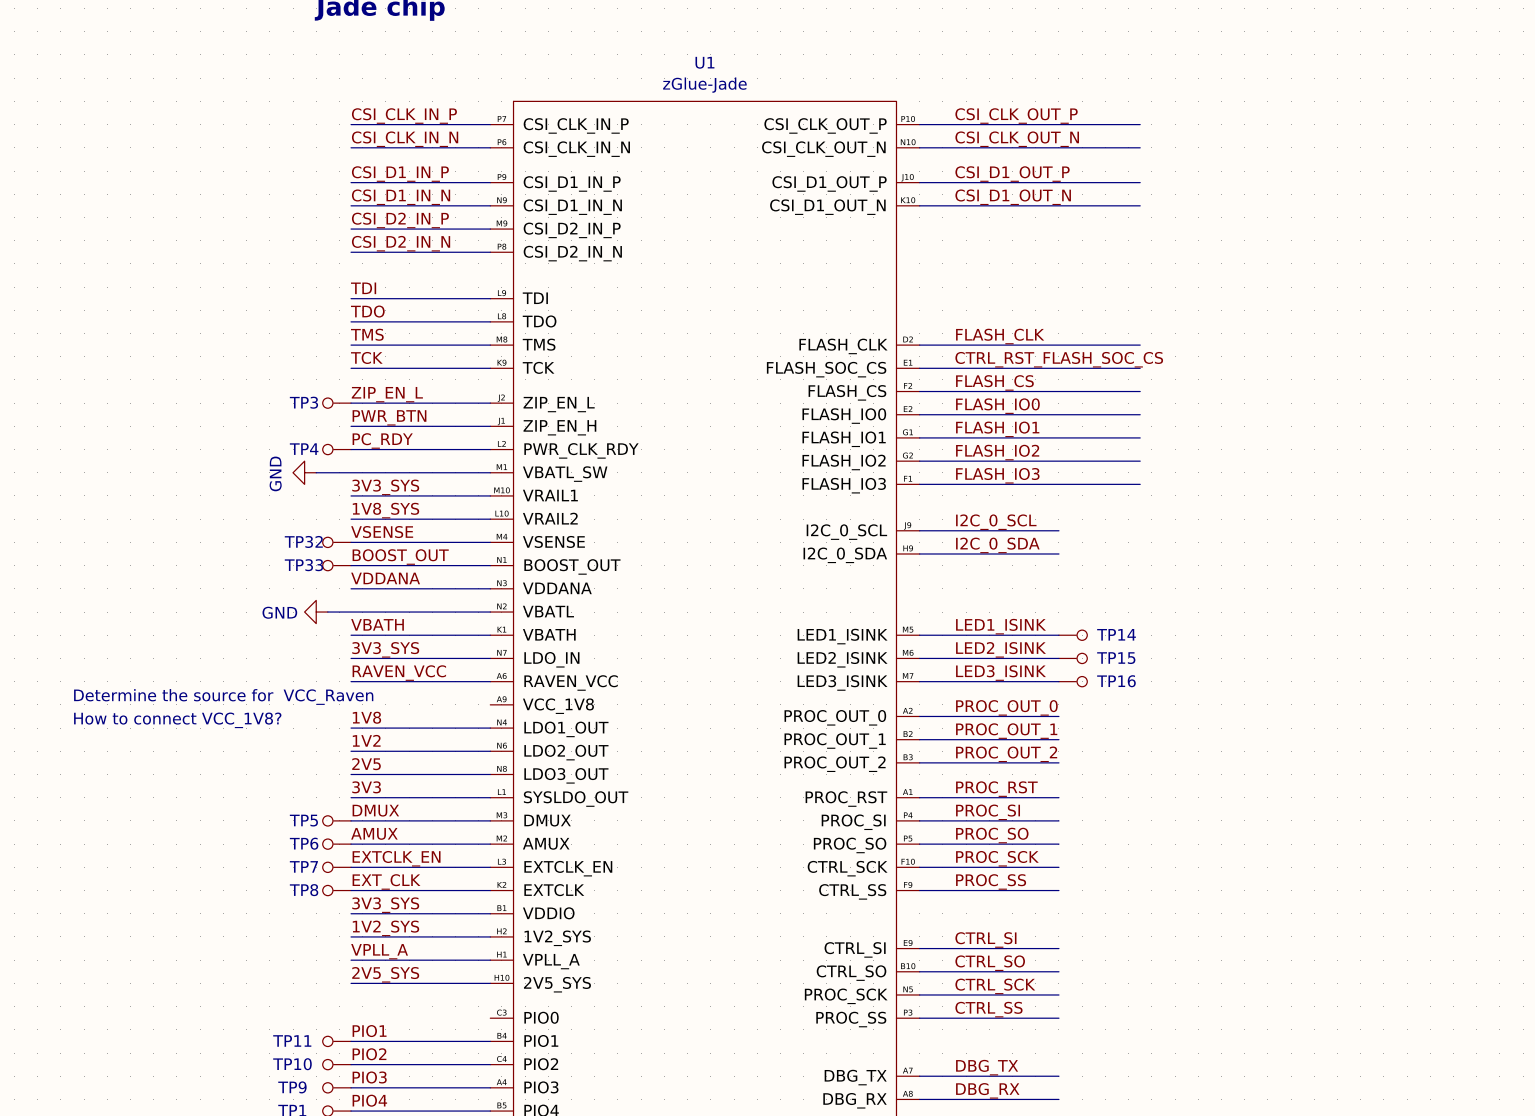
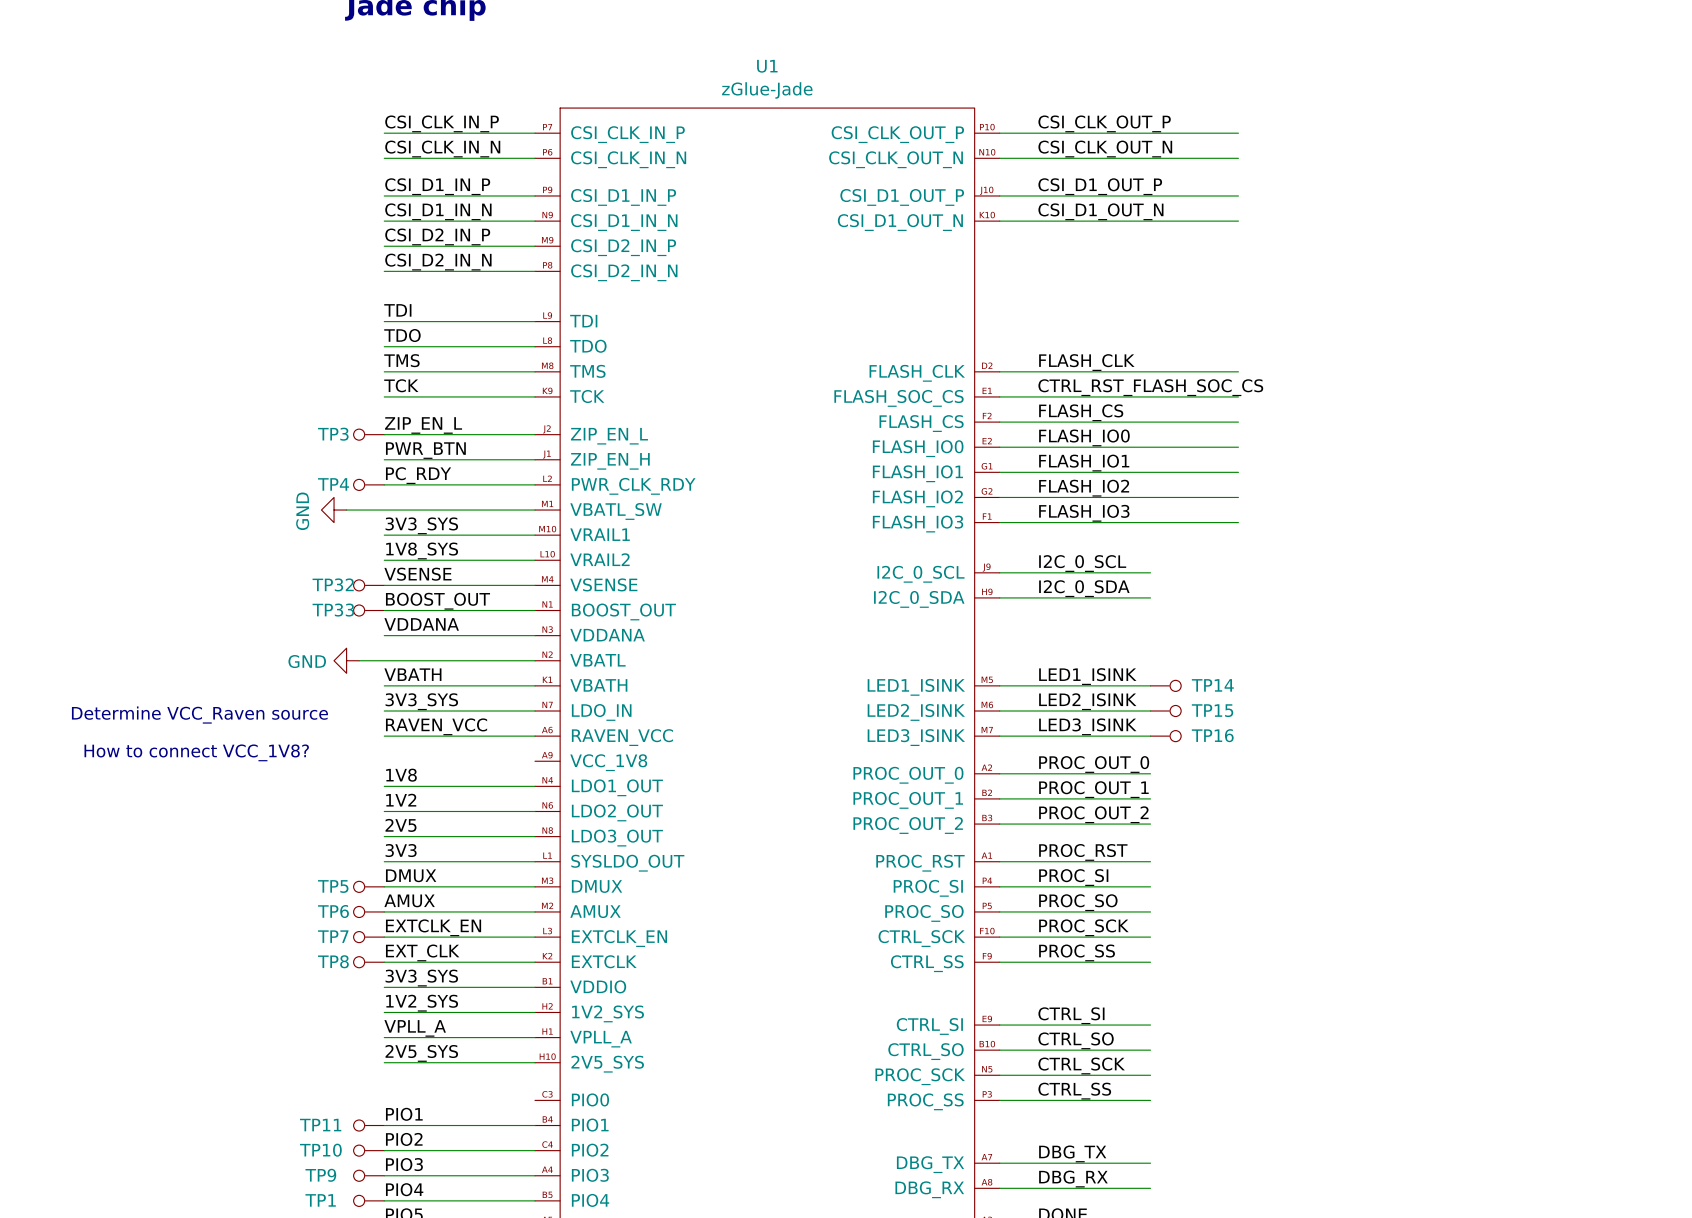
text: none -> Determine VCC_Raven source (199, 715)
text: Determine the source for VCC_Raven (223, 696) -> How to connect VCC_1V8? (196, 752)
text: How to connect VCC_1V8? (177, 720) -> none

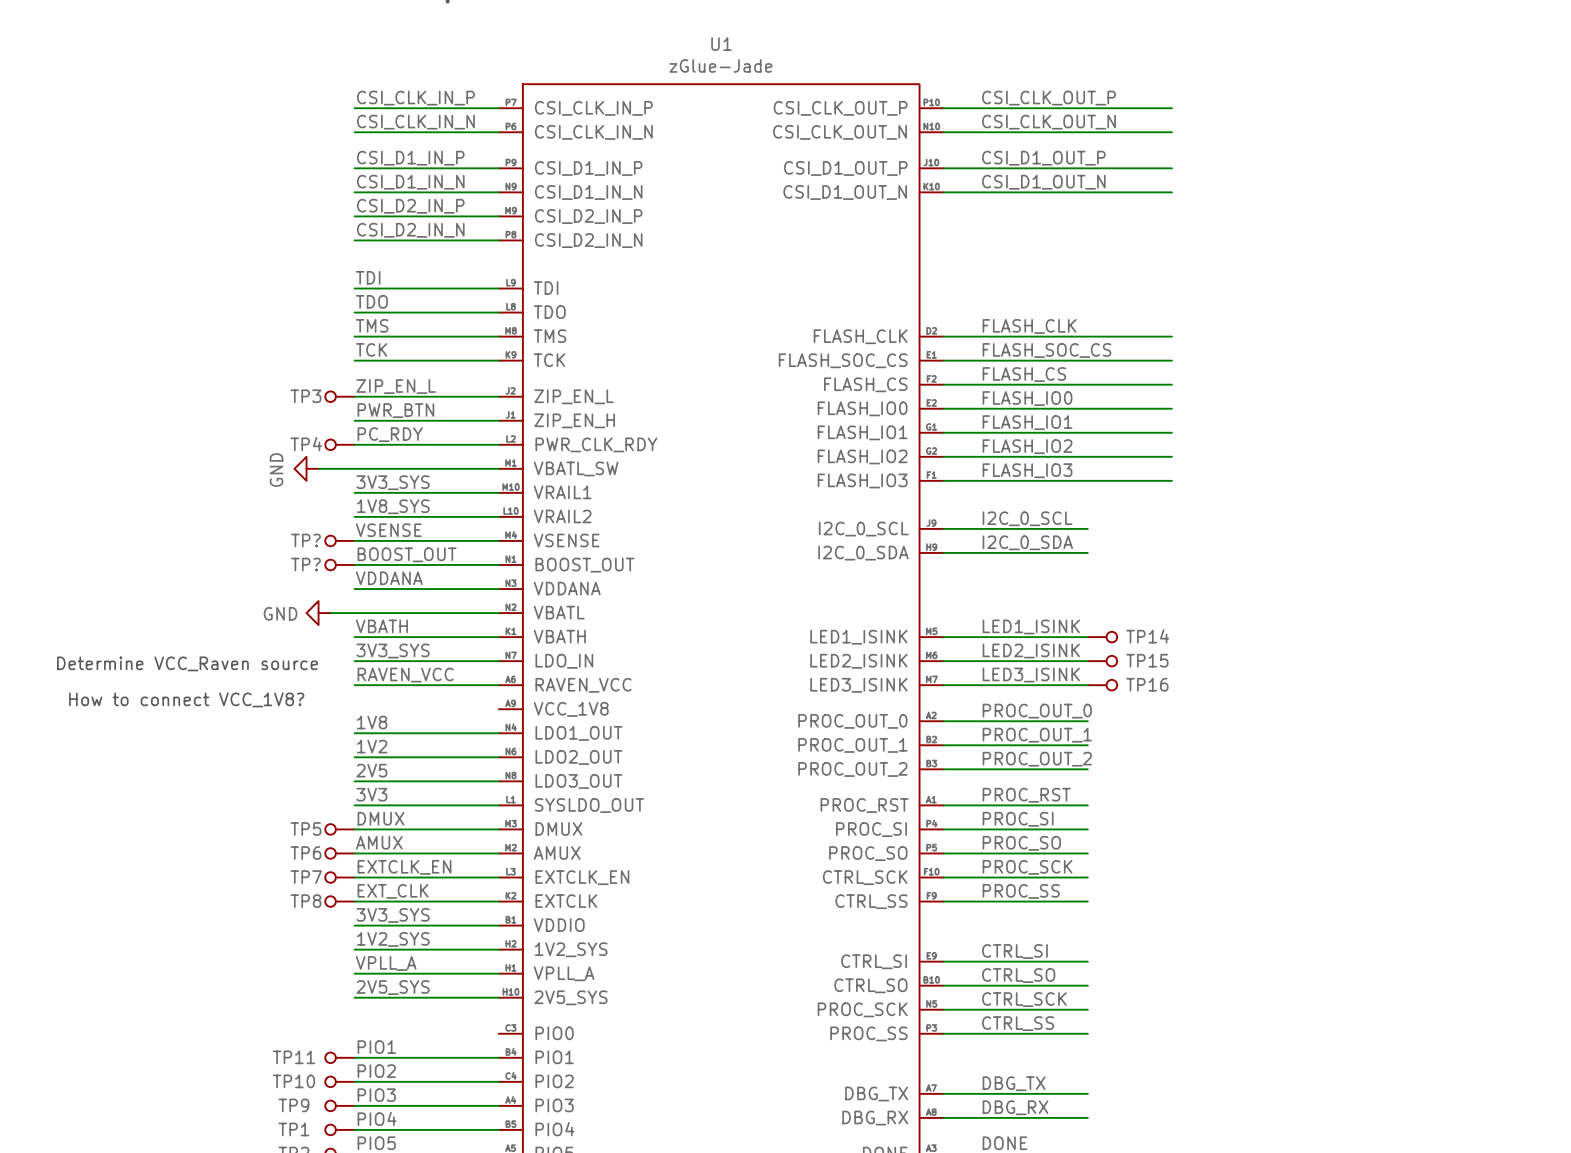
label: CTRL_RST_FLASH_SOC_CS (1150, 387) -> FLASH_SOC_CS (1047, 350)
TP32 name: TP32 (333, 584) -> TP? (305, 540)
TP33 name: TP33 (333, 610) -> TP? (305, 564)

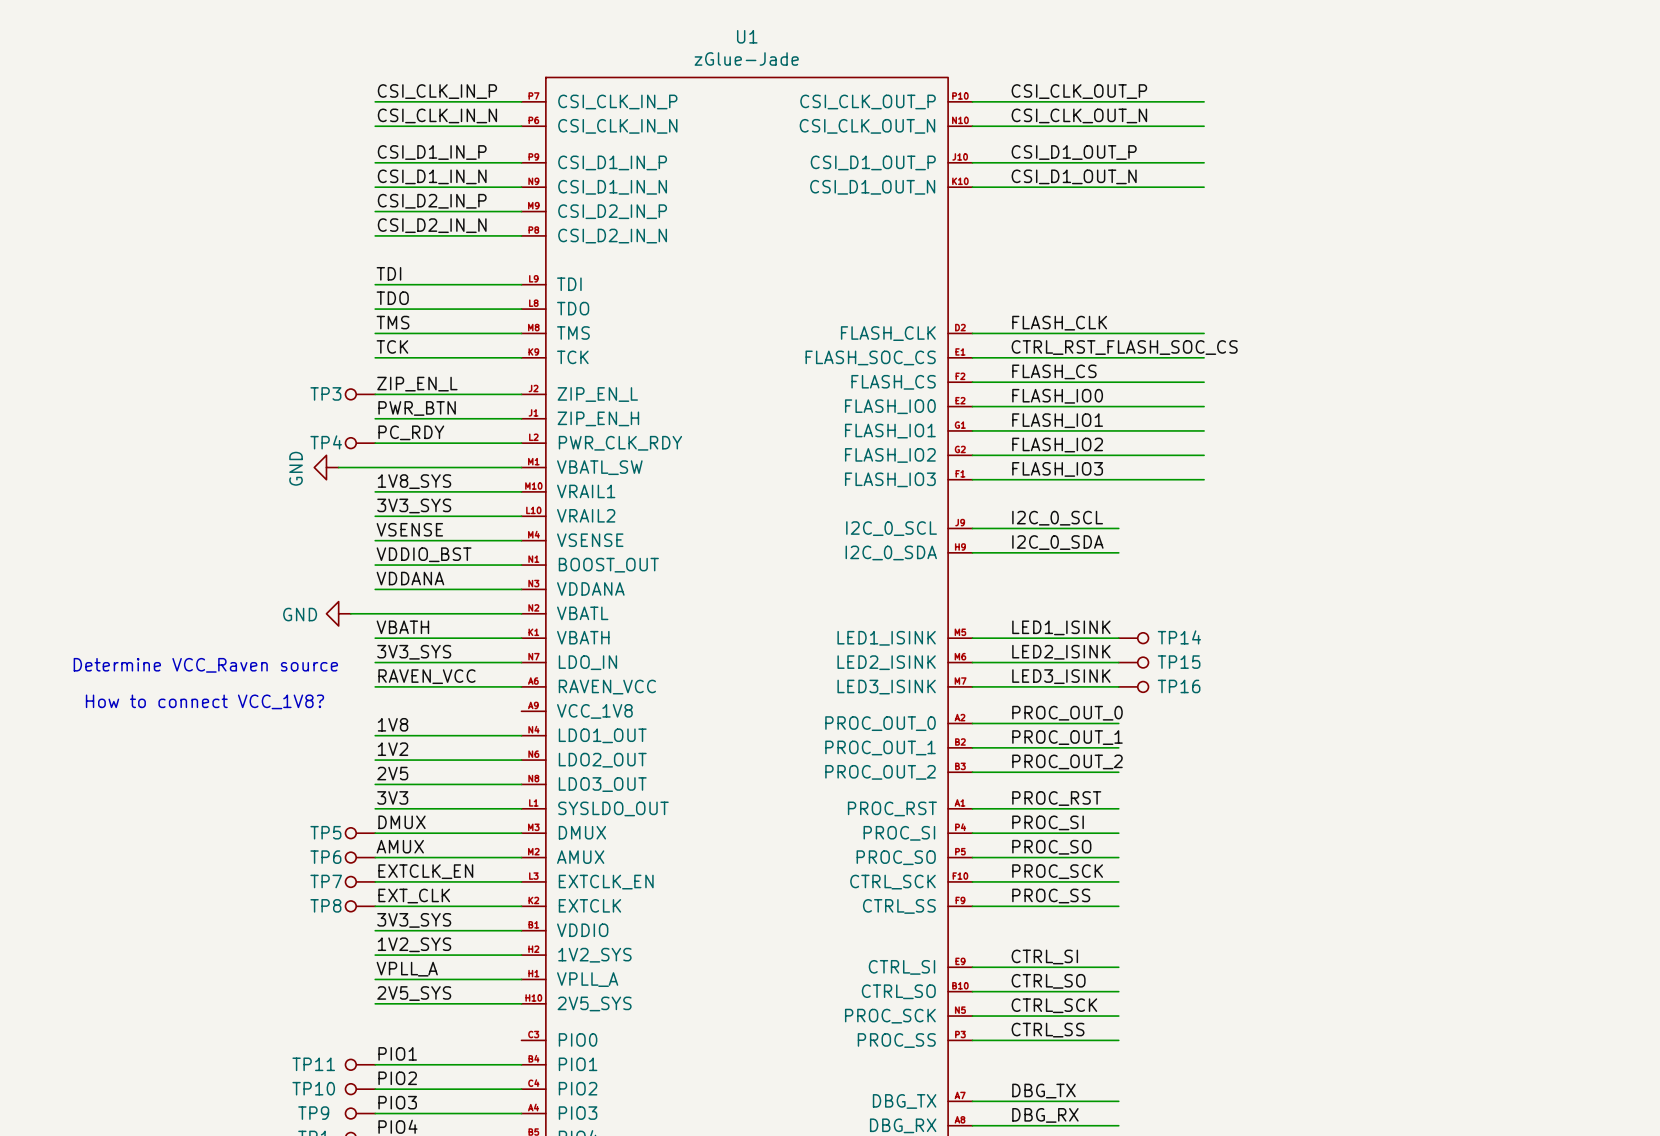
label: FLASH_SOC_CS (1047, 350) -> CTRL_RST_FLASH_SOC_CS (1124, 347)
label: 3V3_SYS (393, 482) -> 1V8_SYS (414, 481)
label: 1V8_SYS (393, 506) -> 3V3_SYS (414, 505)
TP?: (339, 540) -> none
label: BOOST_OUT (407, 554) -> VDDIO_BST (424, 554)
TP?: (339, 564) -> none

